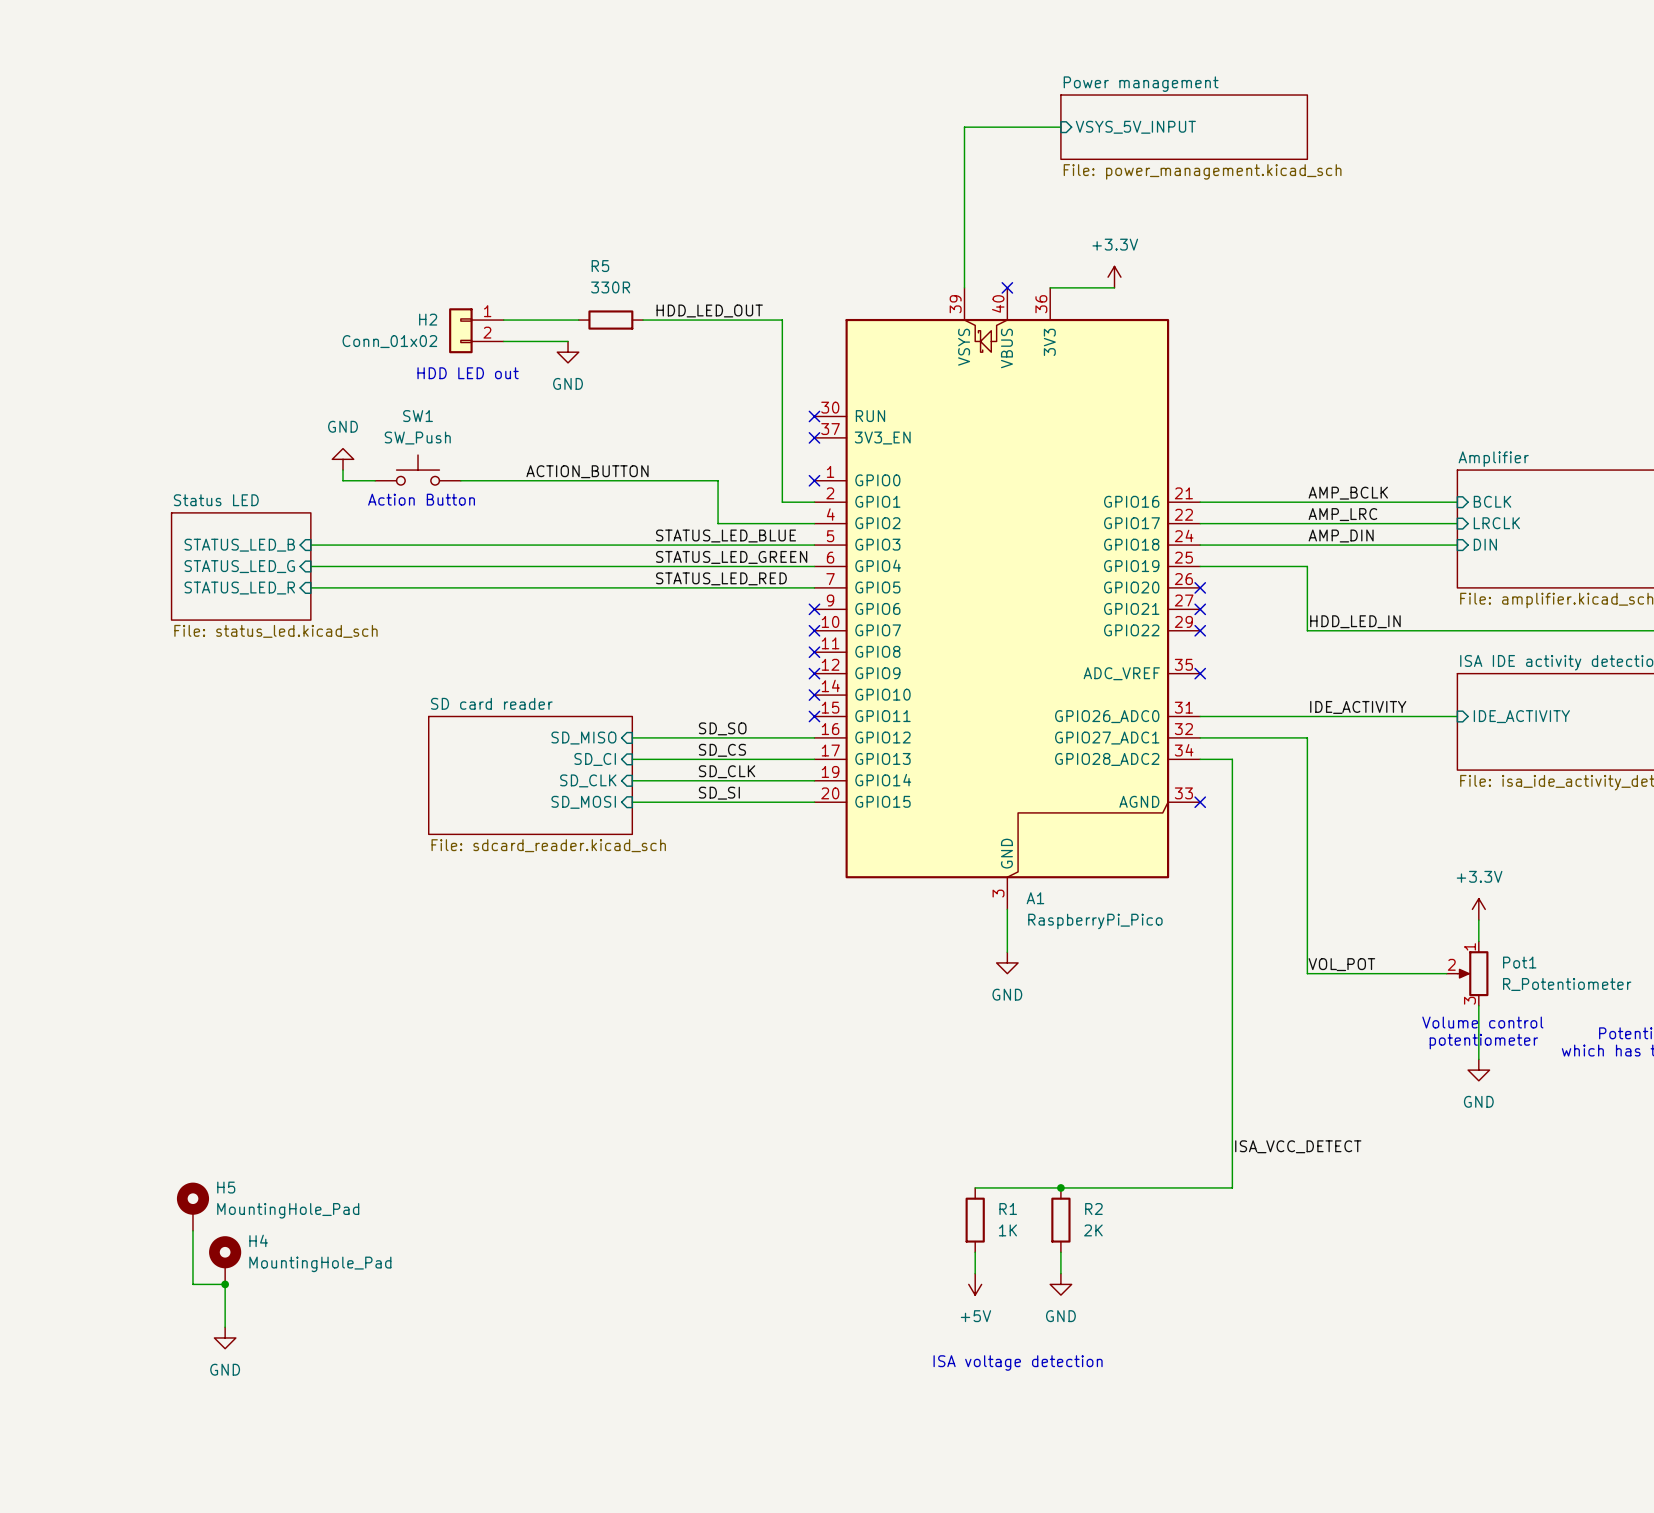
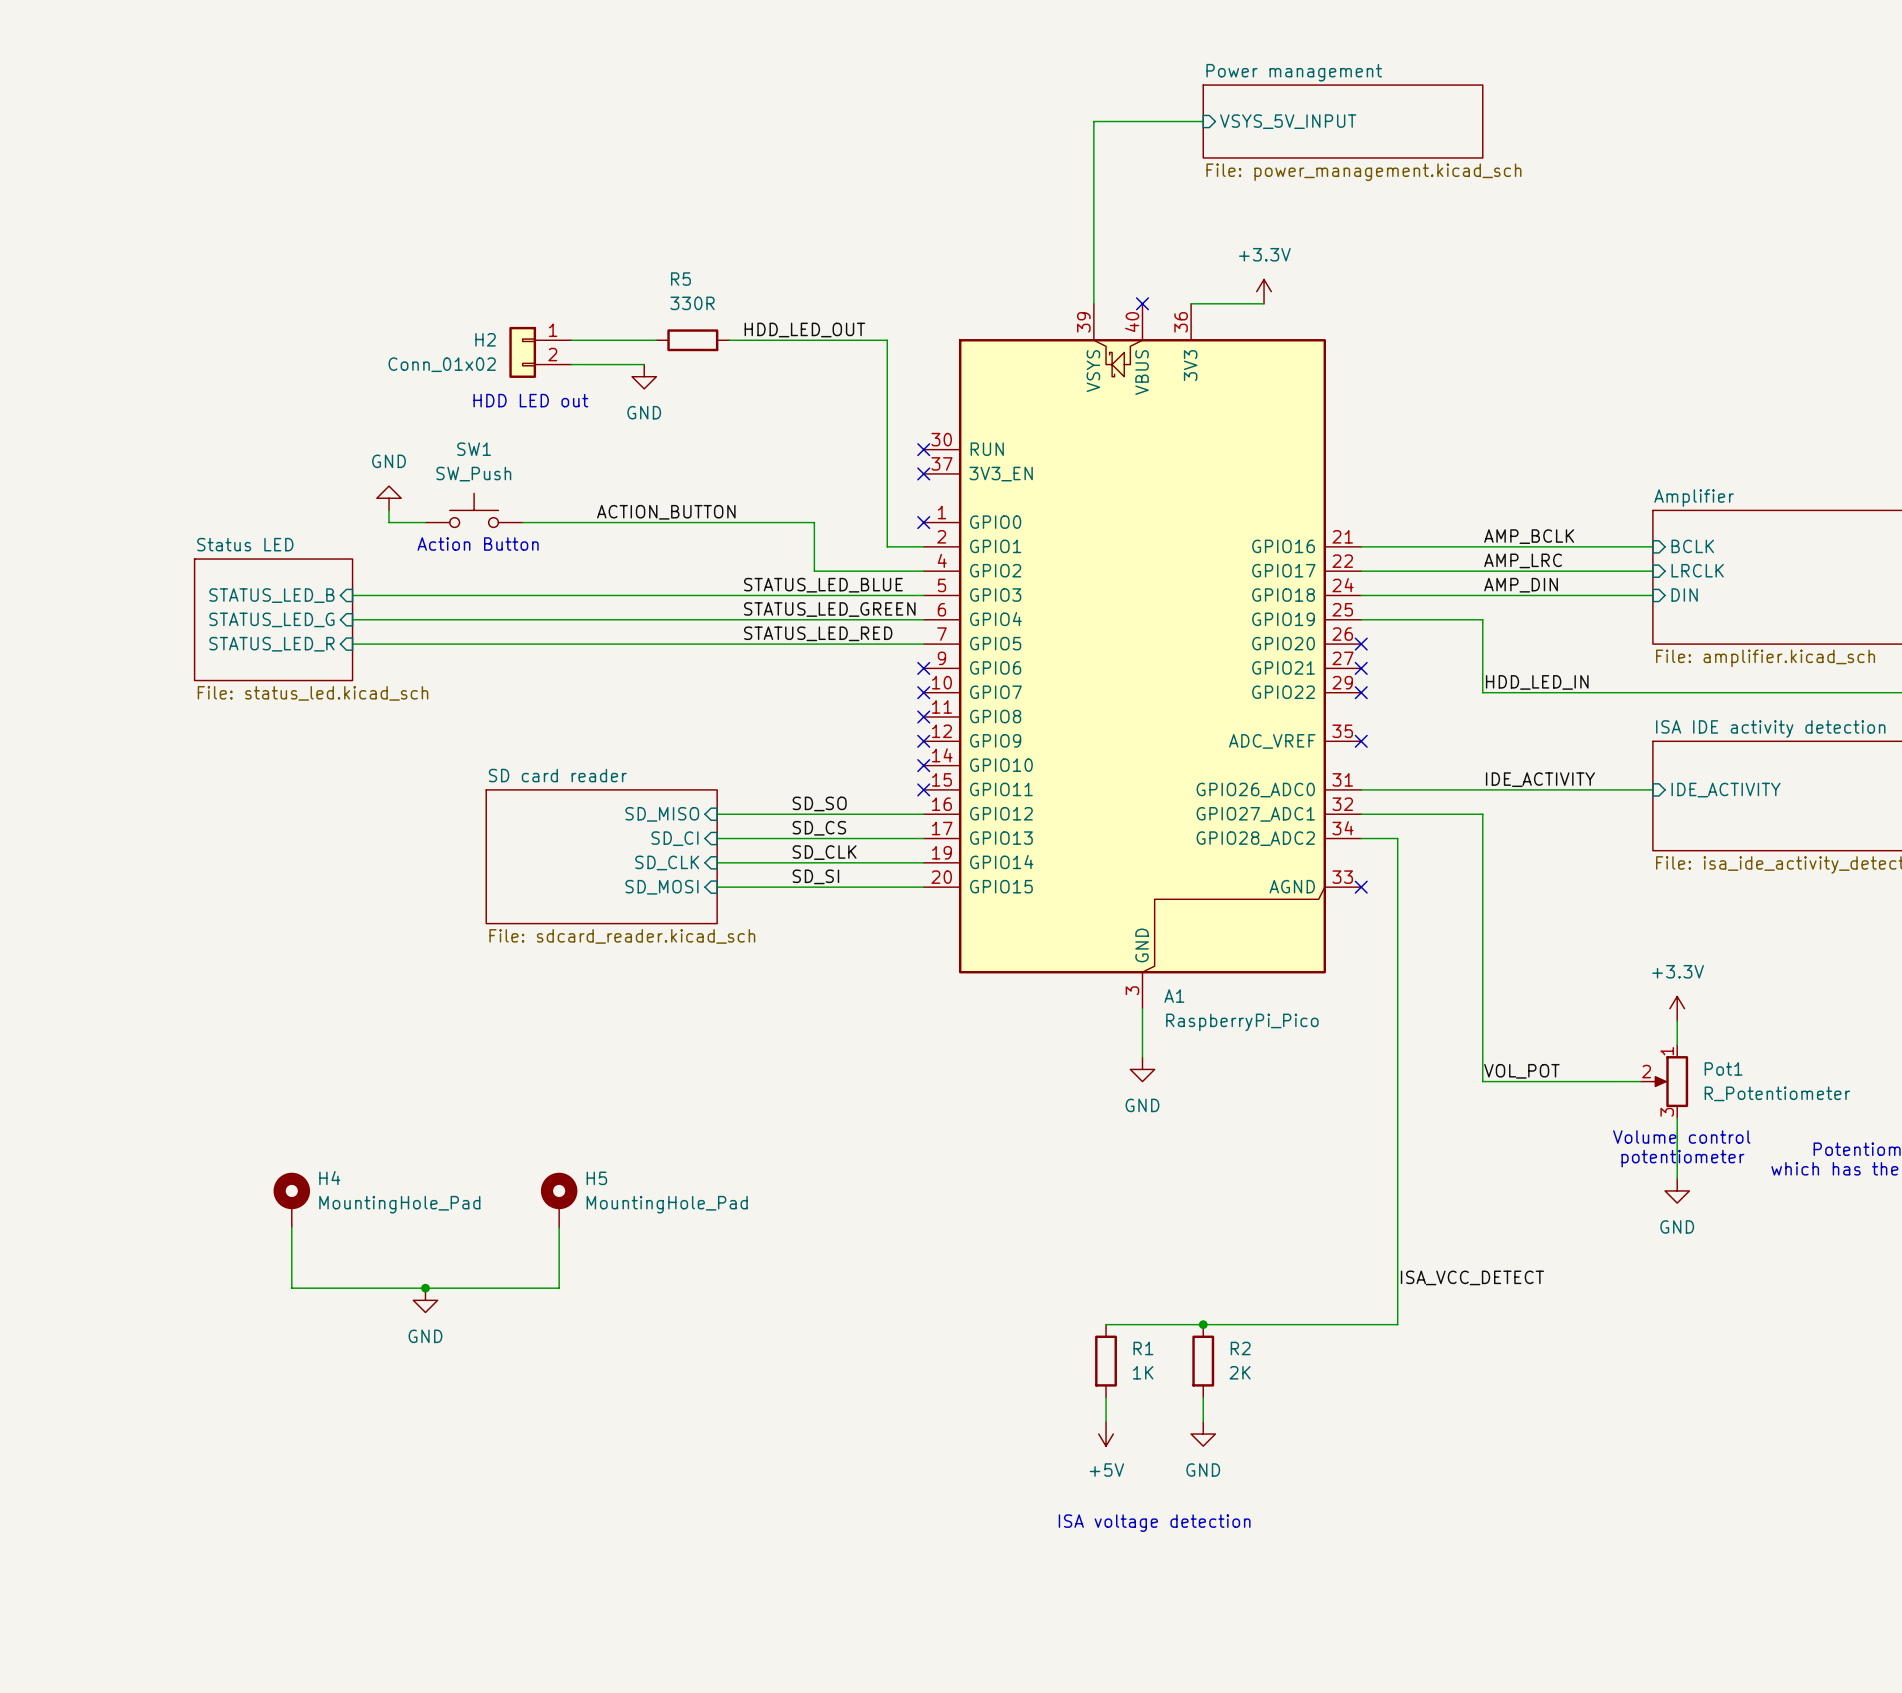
wire: none -> (291, 1227) (291, 1288) (559, 1288) (559, 1227)
junction: none -> (425, 1288)
power symbol: none -> GND (425, 1300)
H5 position: (192, 1206) -> (559, 1200)
wire: (192, 1230) (192, 1284) (225, 1284) (225, 1327) -> none
H4 position: (225, 1260) -> (291, 1200)
junction: (225, 1284) -> none
power symbol: GND (225, 1337) -> none

